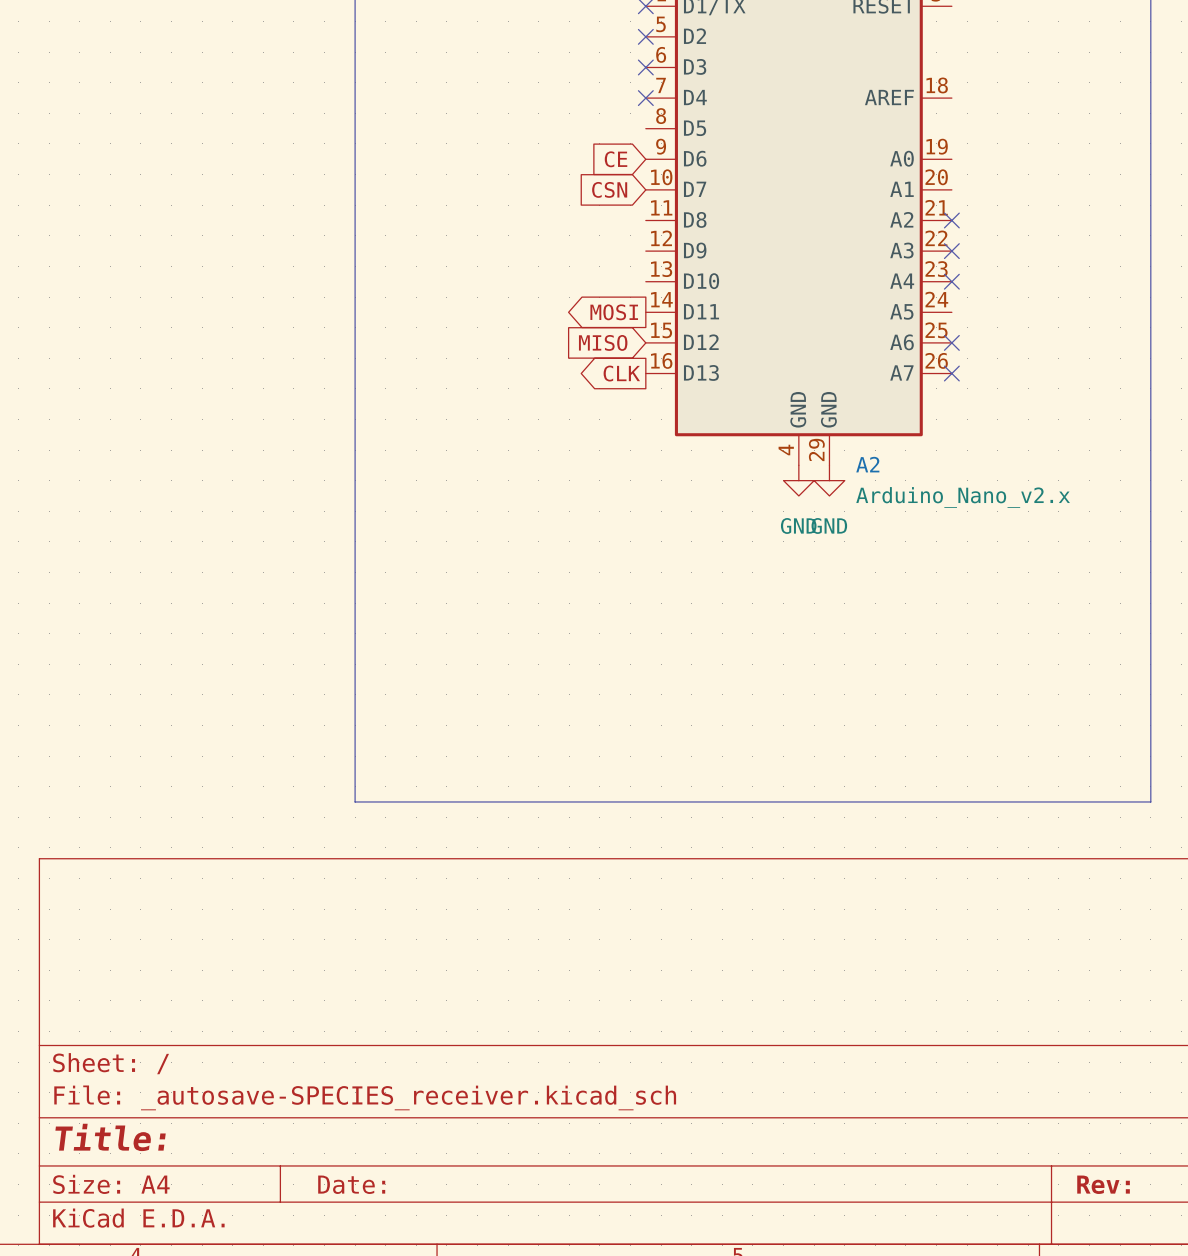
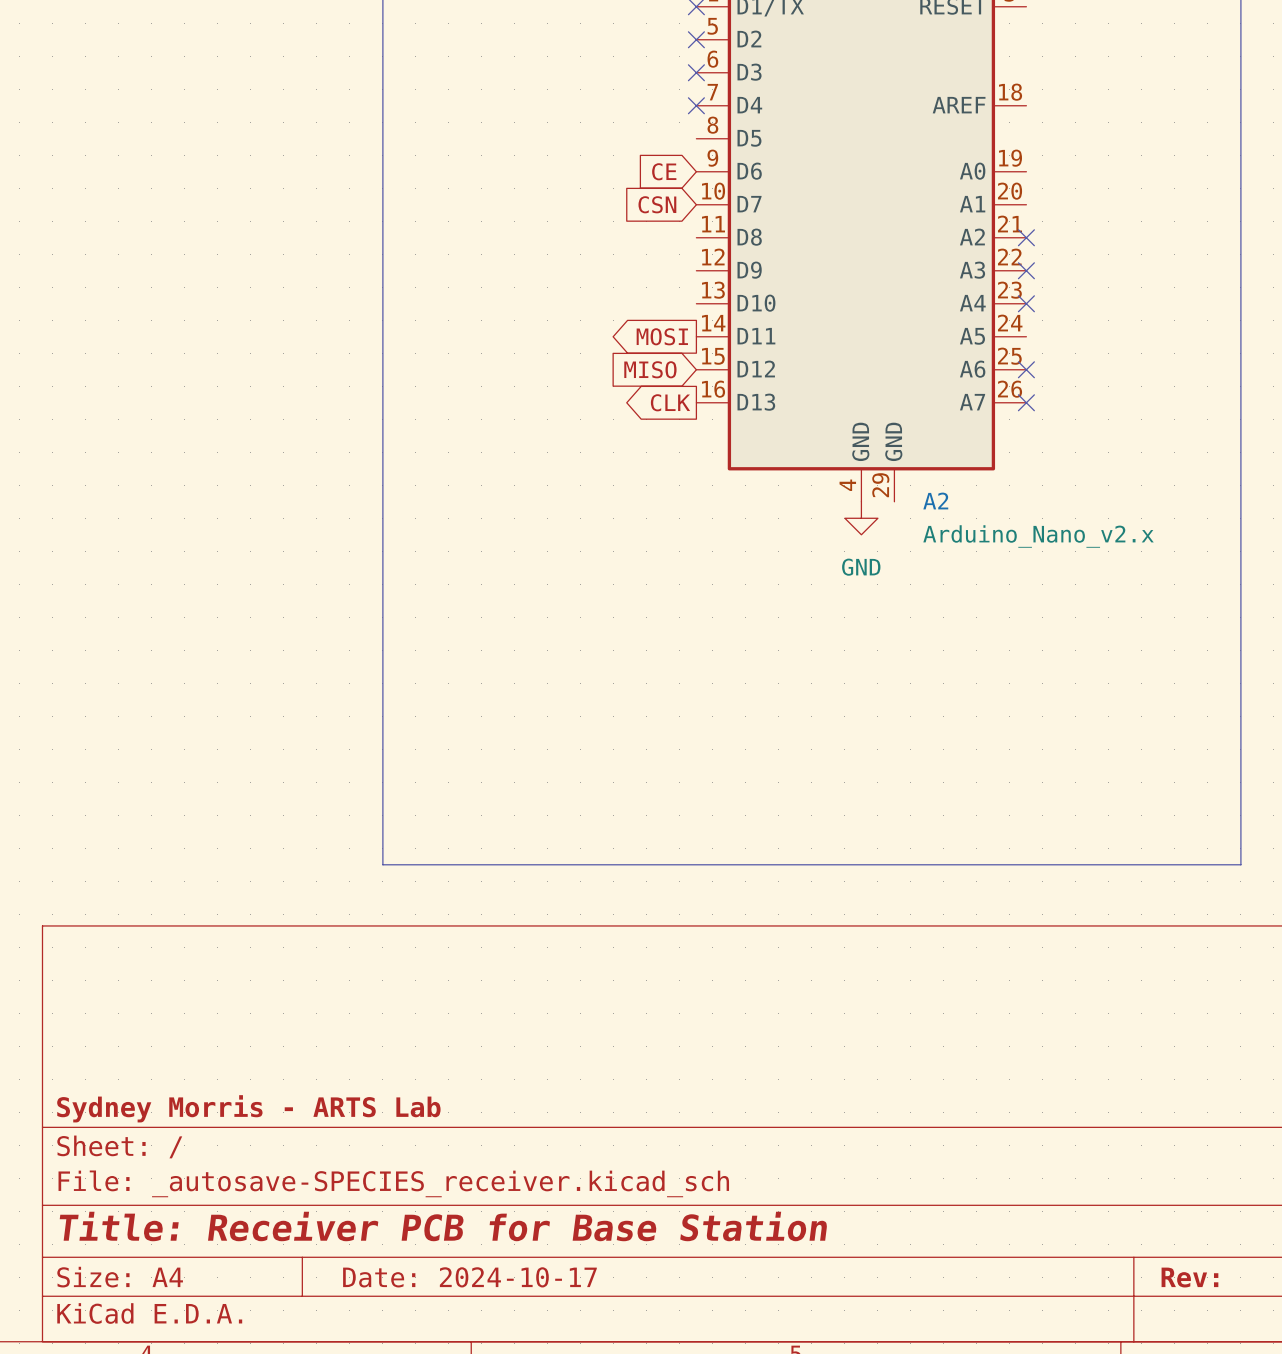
power symbol: GND (829, 480) -> none
title block: none -> Sydney Morris - ARTS Lab (248, 1108)
title block: Title: (110, 1137) -> Title: Receiver PCB for Base Station (443, 1226)
title block: Date: (351, 1184) -> Date: 2024-10-17 (469, 1277)

